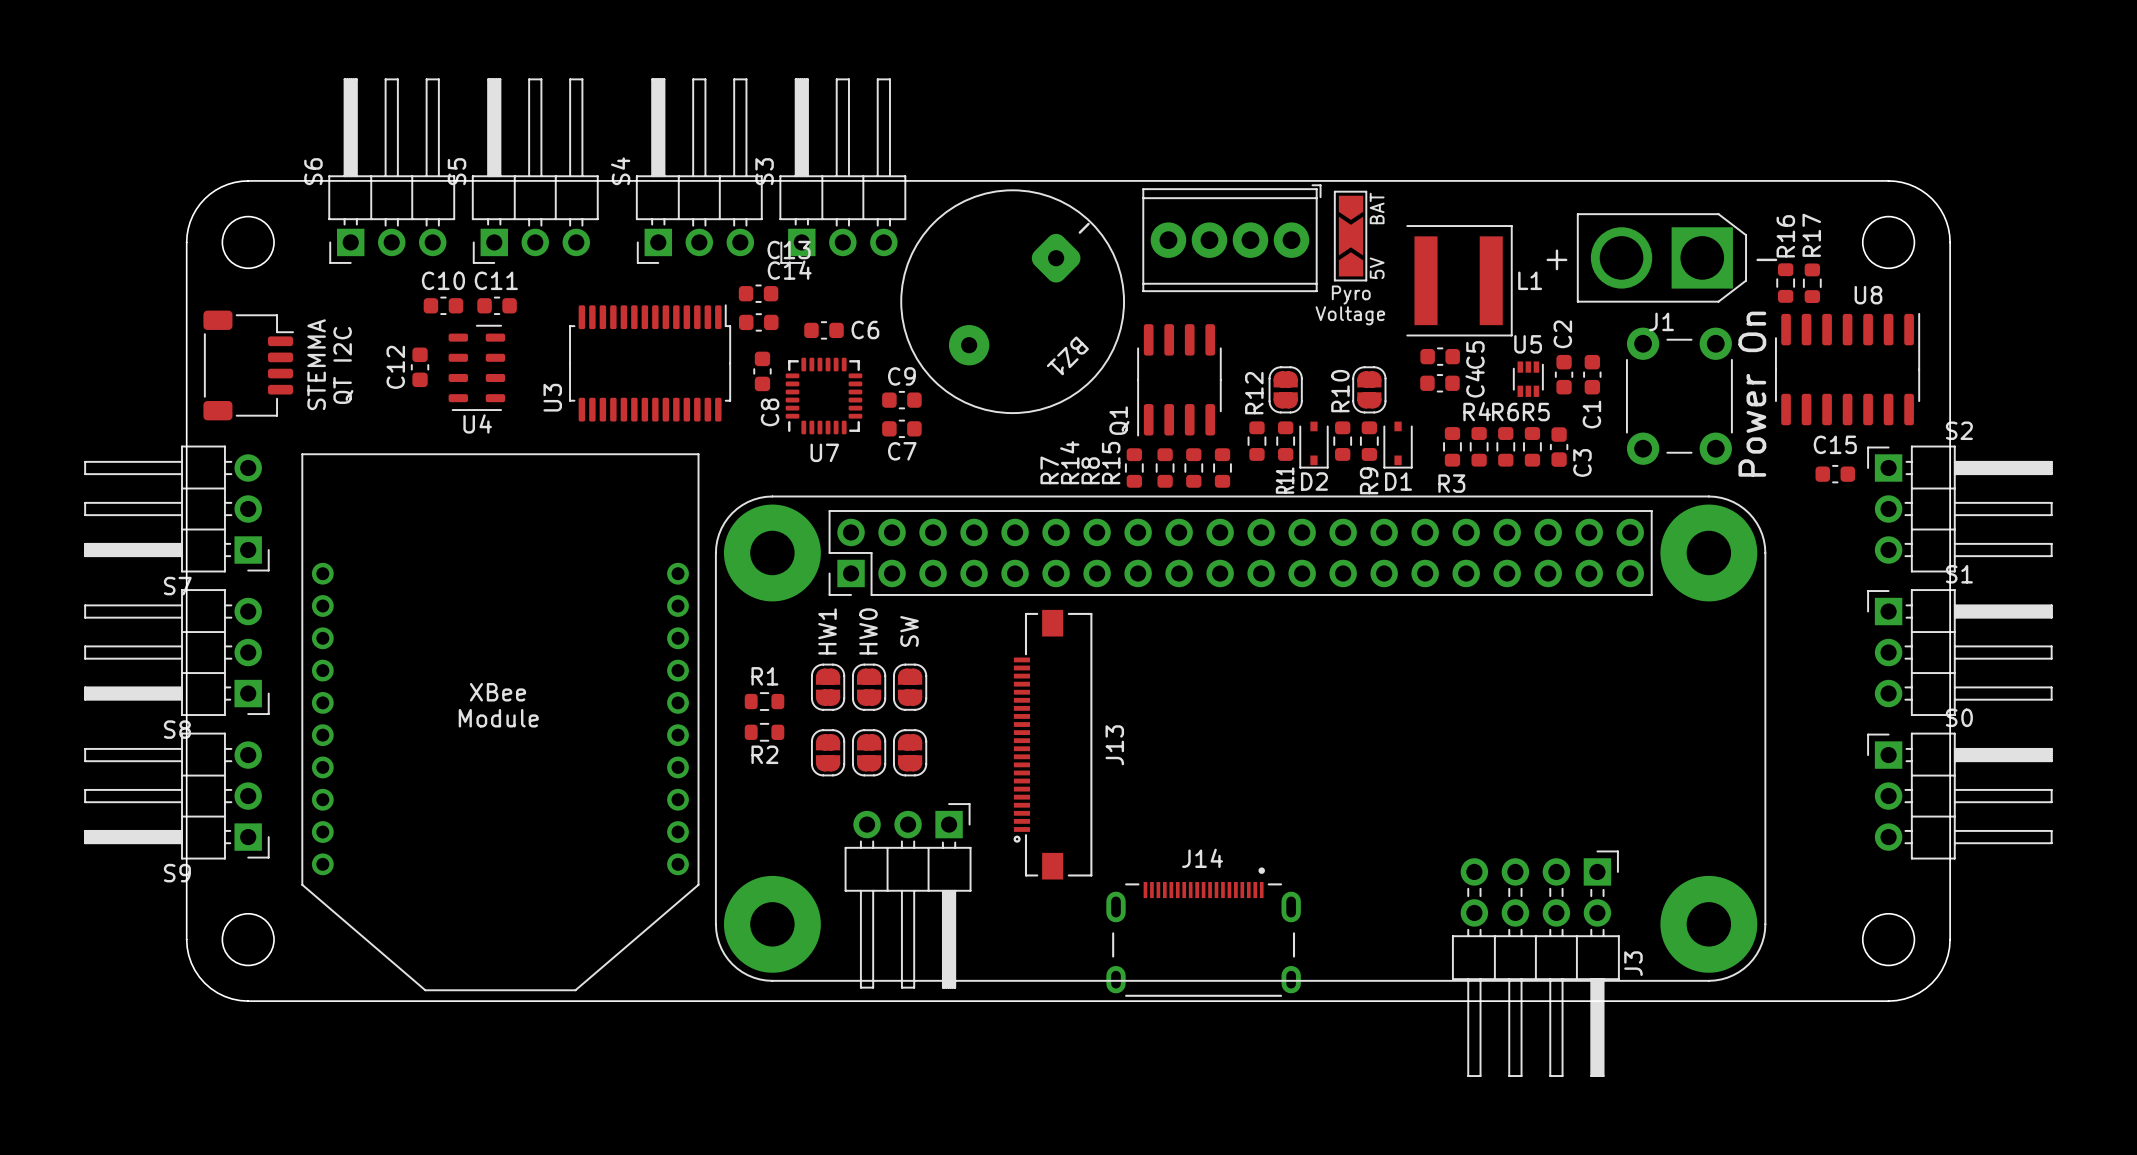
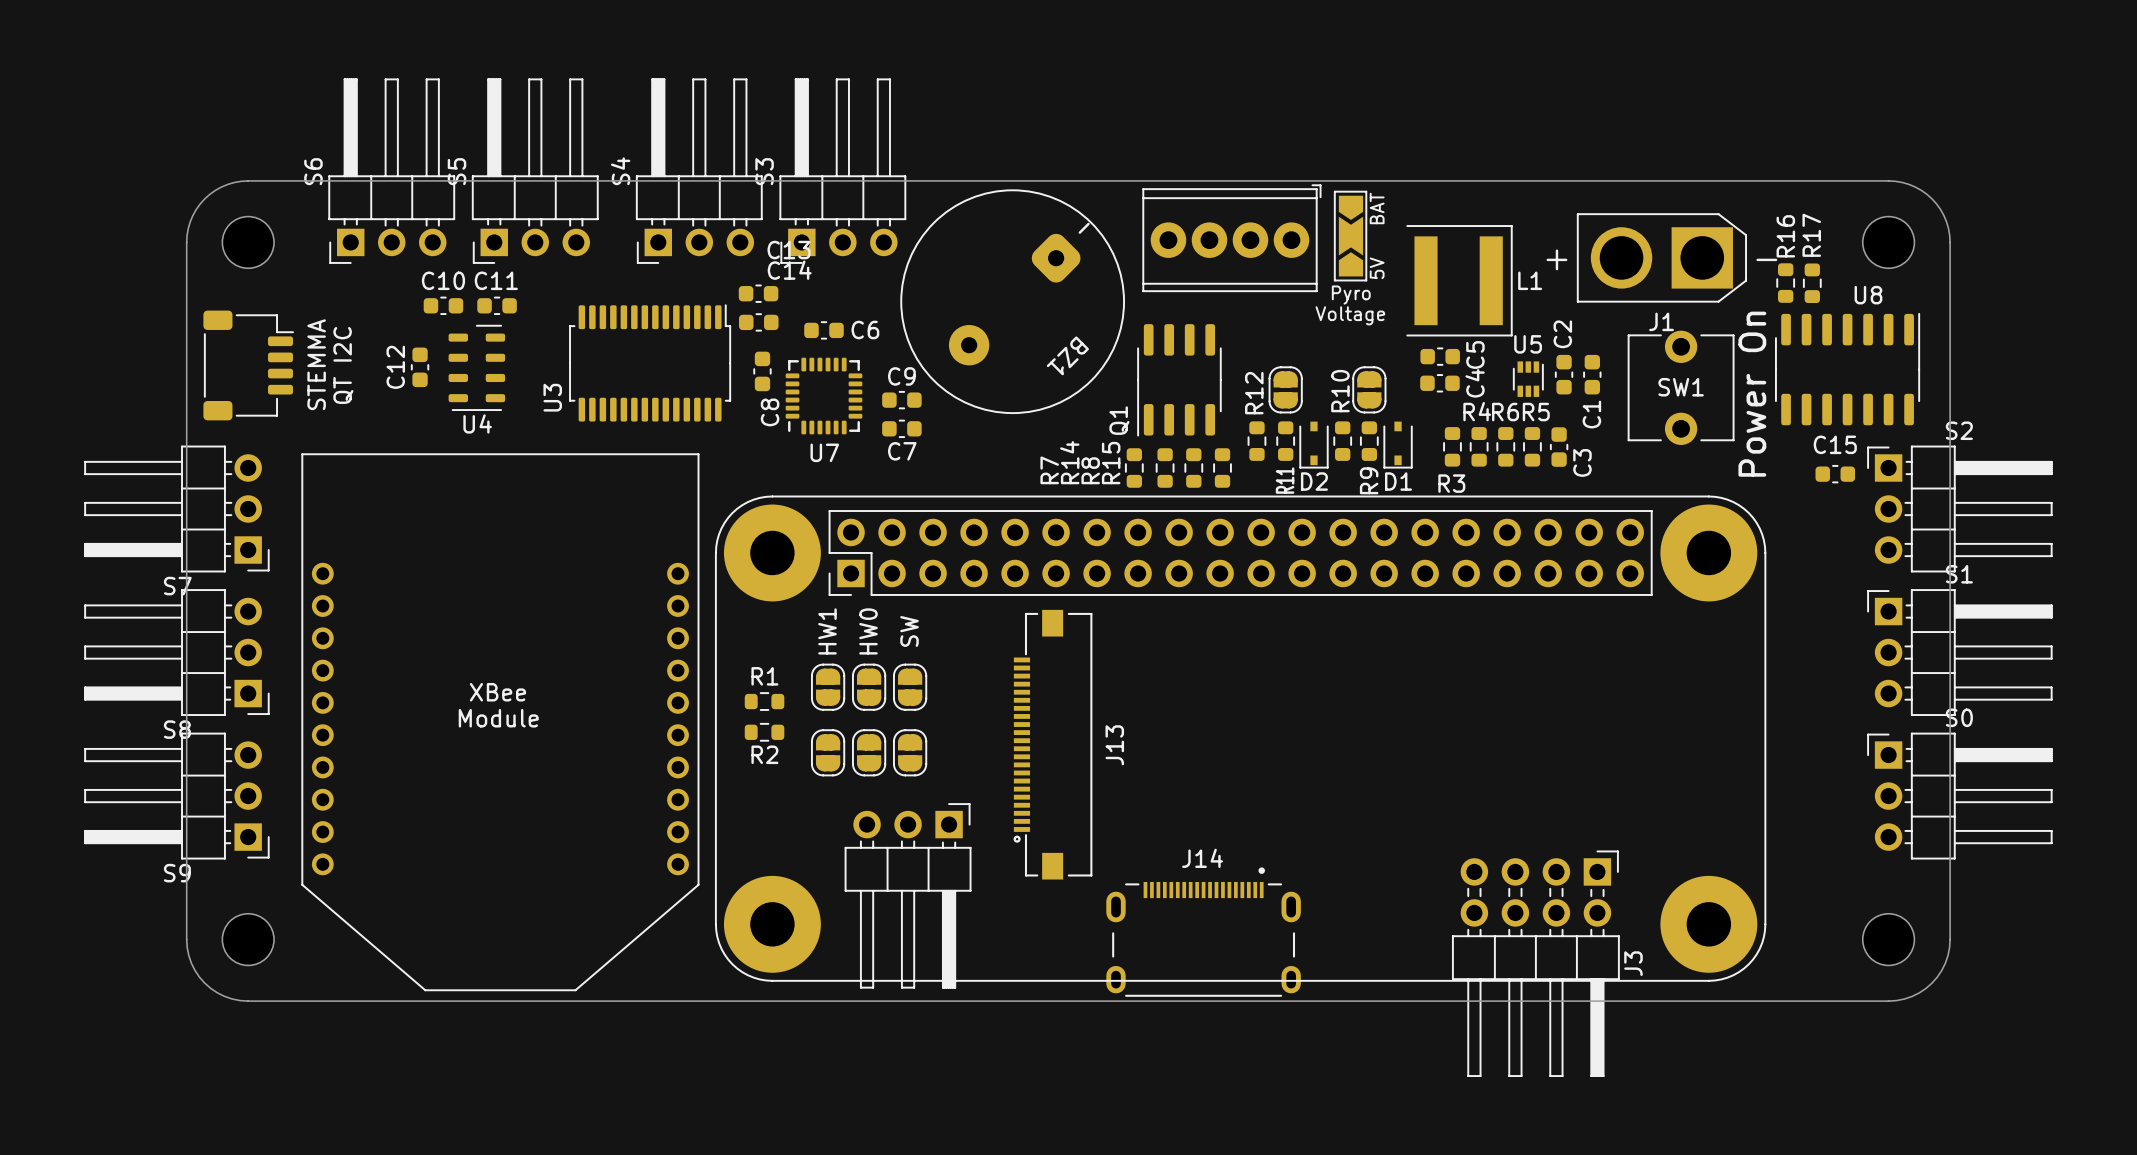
SW1: none -> (1681, 387)
part: (1679, 396) -> none

